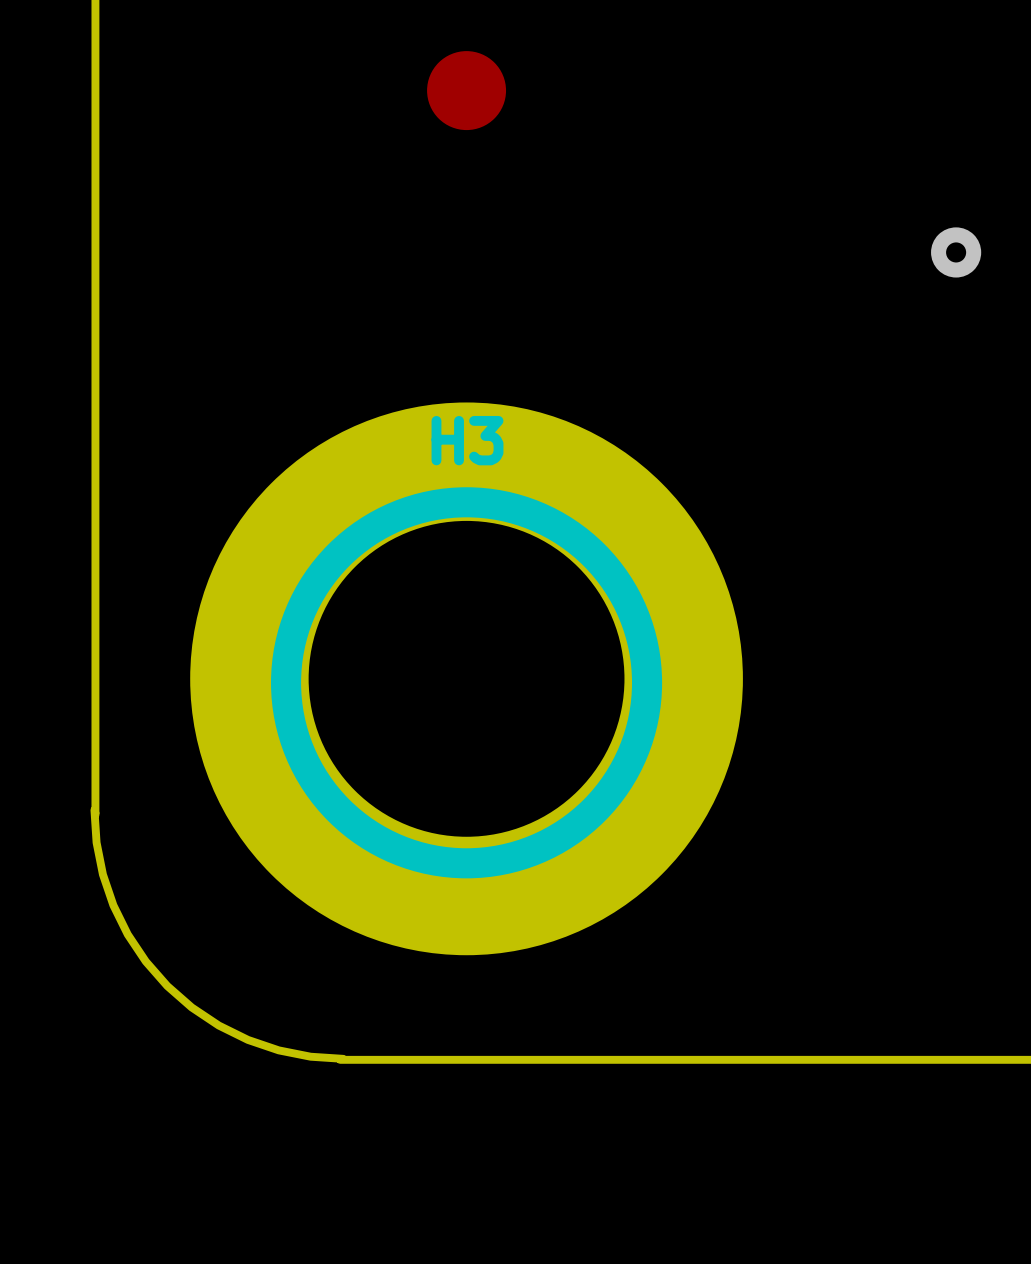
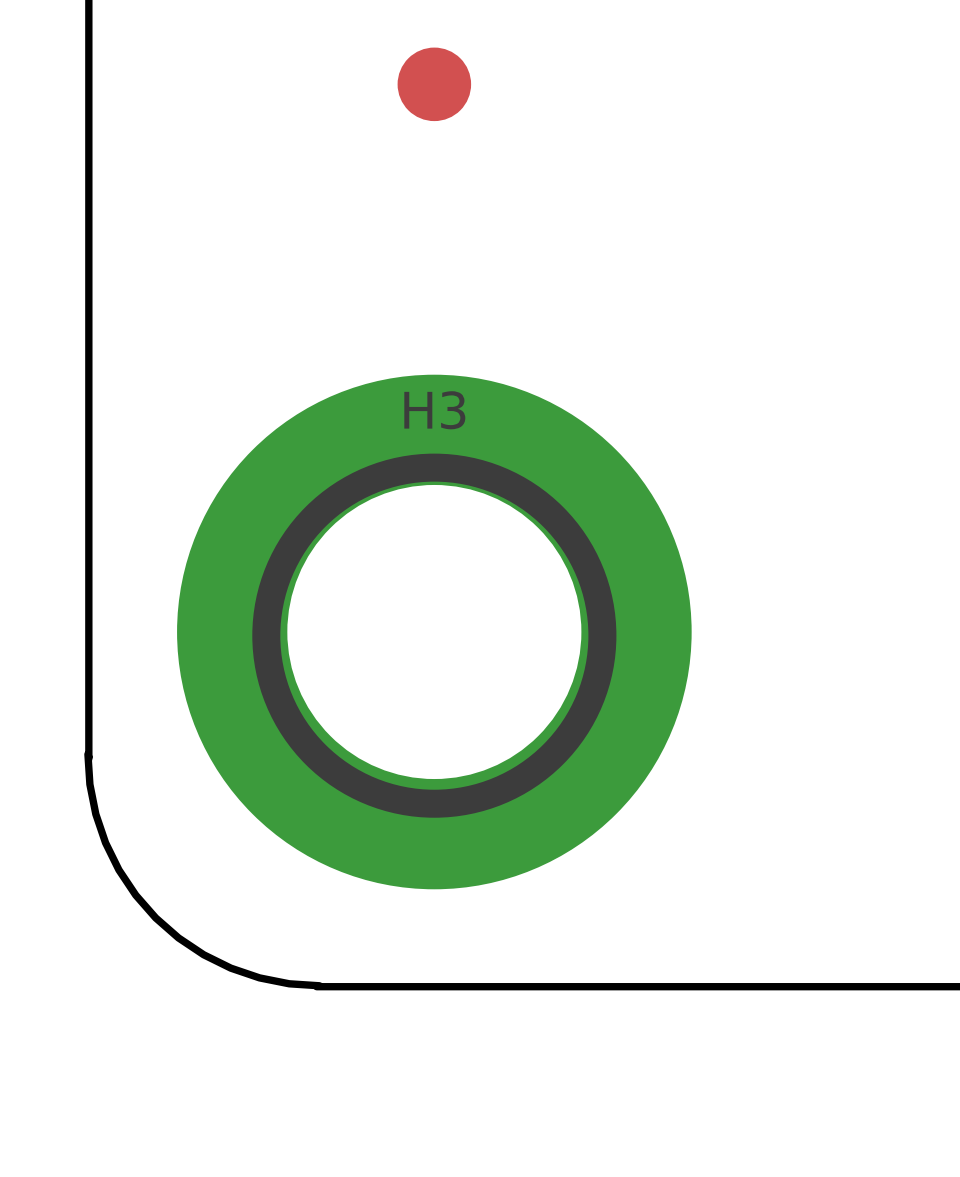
via: (956, 252) -> none

